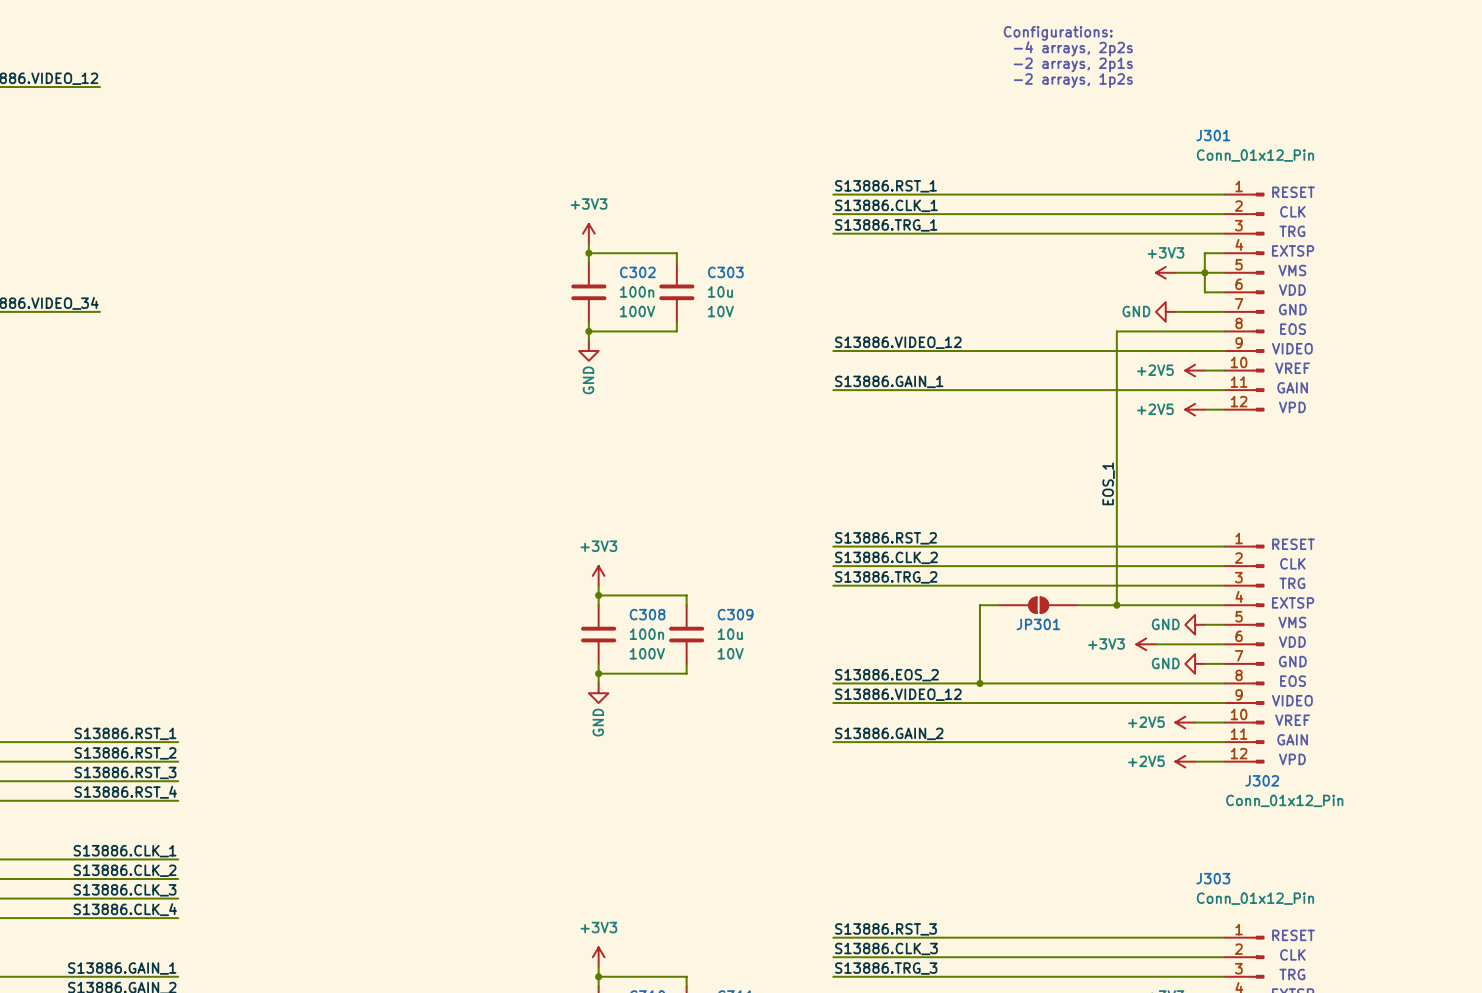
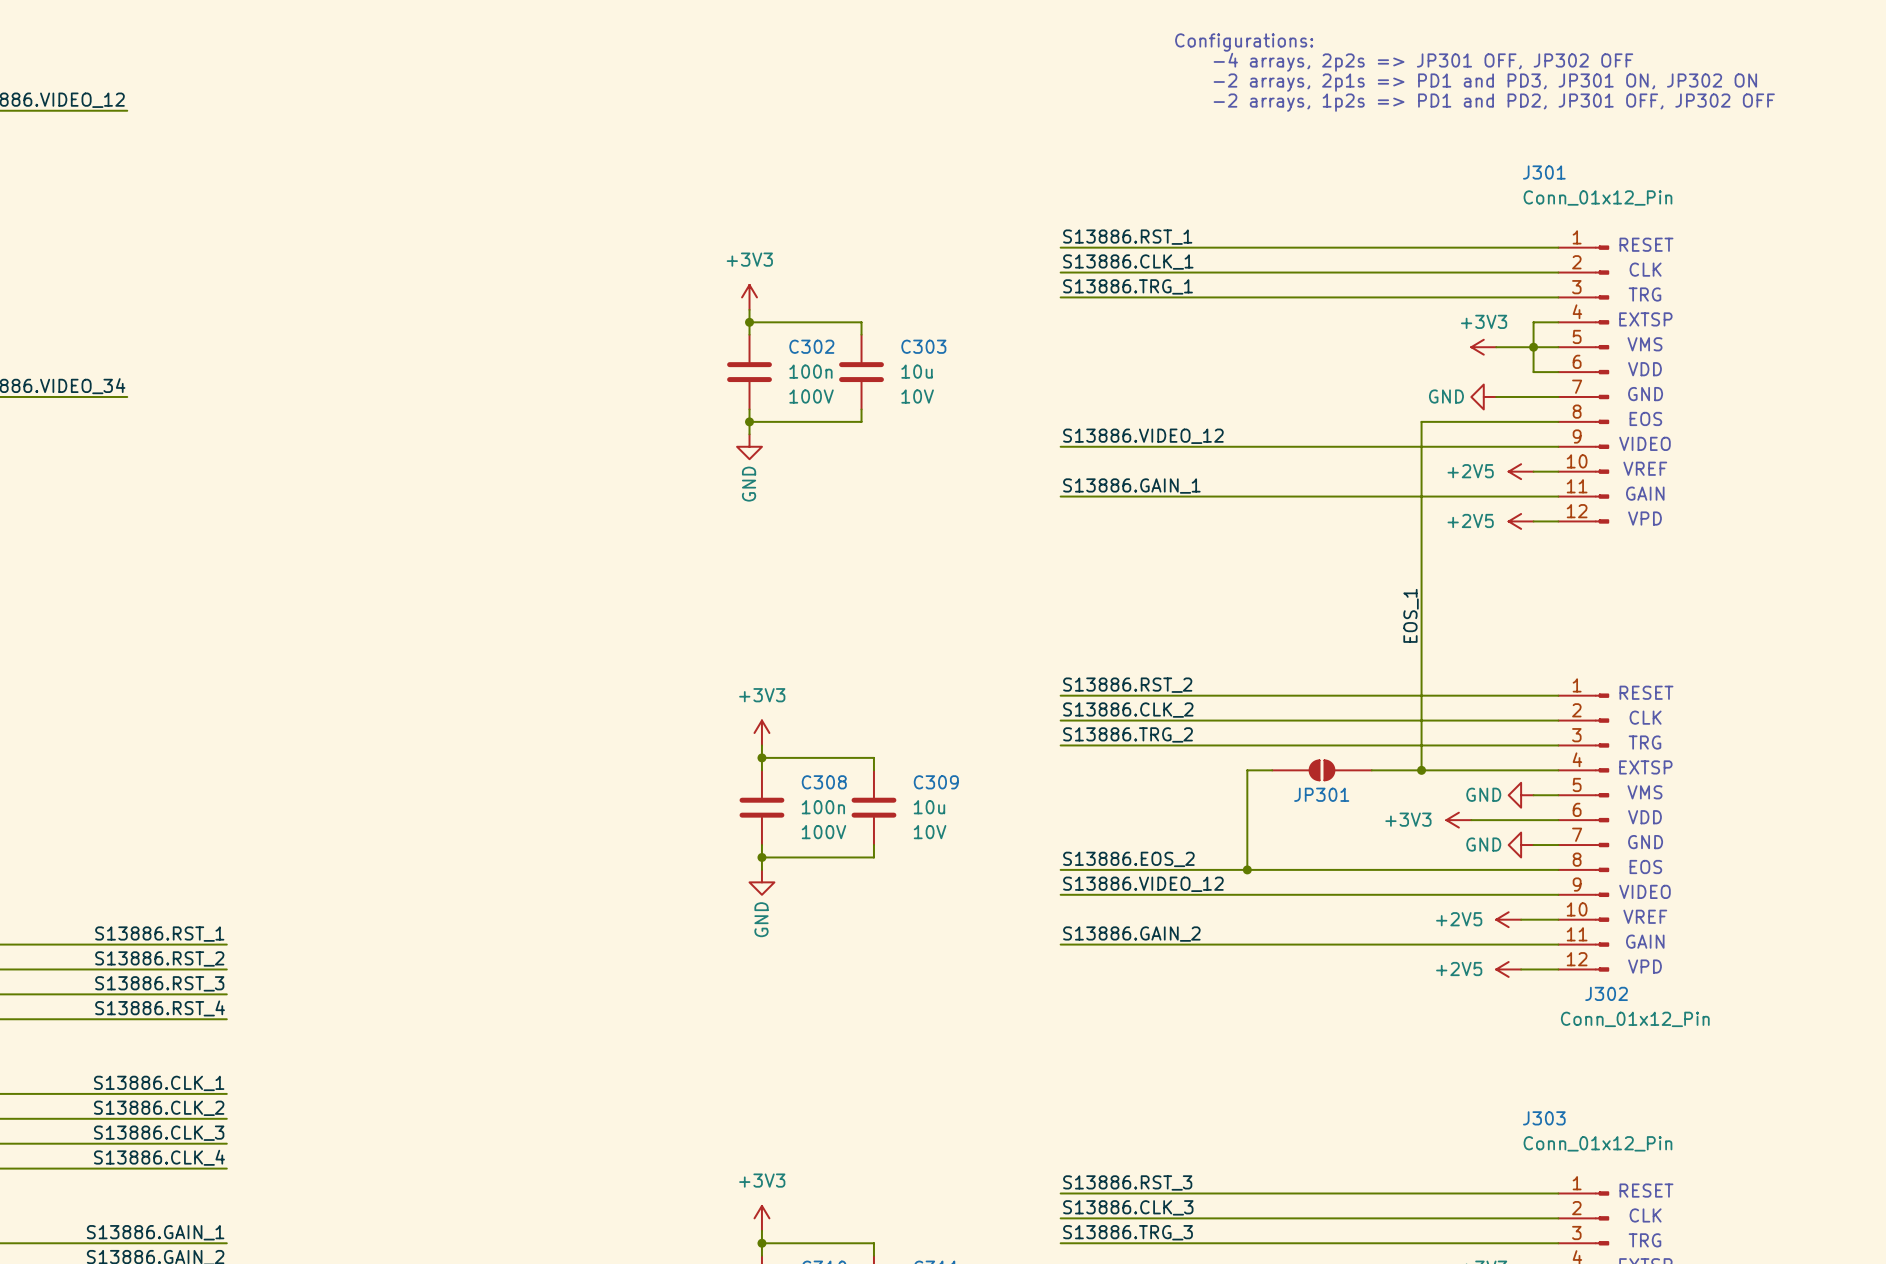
text position: Configurations: (1058, 33) -> Configurations: (1244, 42)
text: -4 arrays, 2p2s (1073, 48) -> -4 arrays, 2p2s => JP301 OFF, JP302 OFF (1423, 62)
text: -2 arrays, 2p1s (1073, 64) -> none
text: none -> -2 arrays, 2p1s => PD1 and PD3, JP301 ON, JP302 ON (1485, 82)
text: -2 arrays, 1p2s (1073, 80) -> none
text: none -> -2 arrays, 1p2s => PD1 and PD2, JP301 OFF, JP302 OFF (1494, 102)

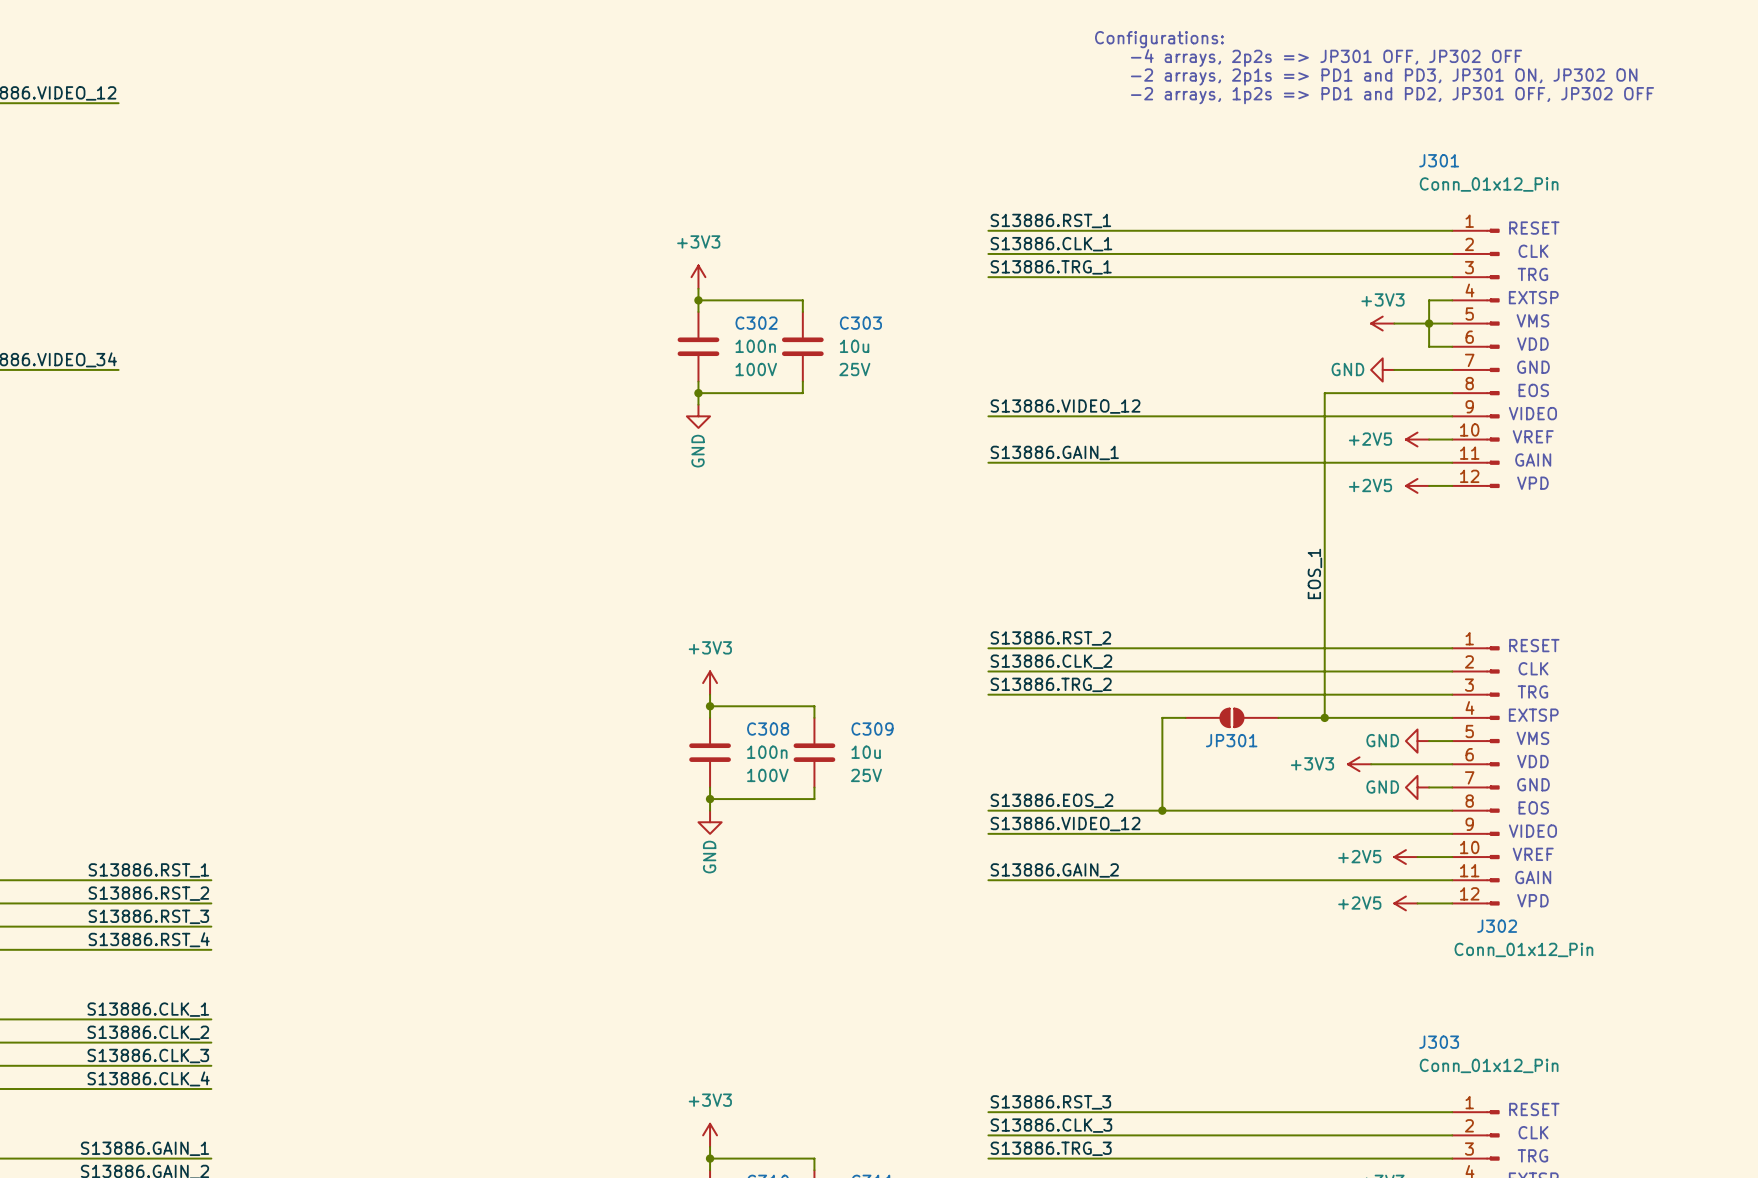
C303 text: 10V (917, 396) -> 25V (854, 369)
C309 text: 10V (930, 832) -> 25V (866, 775)

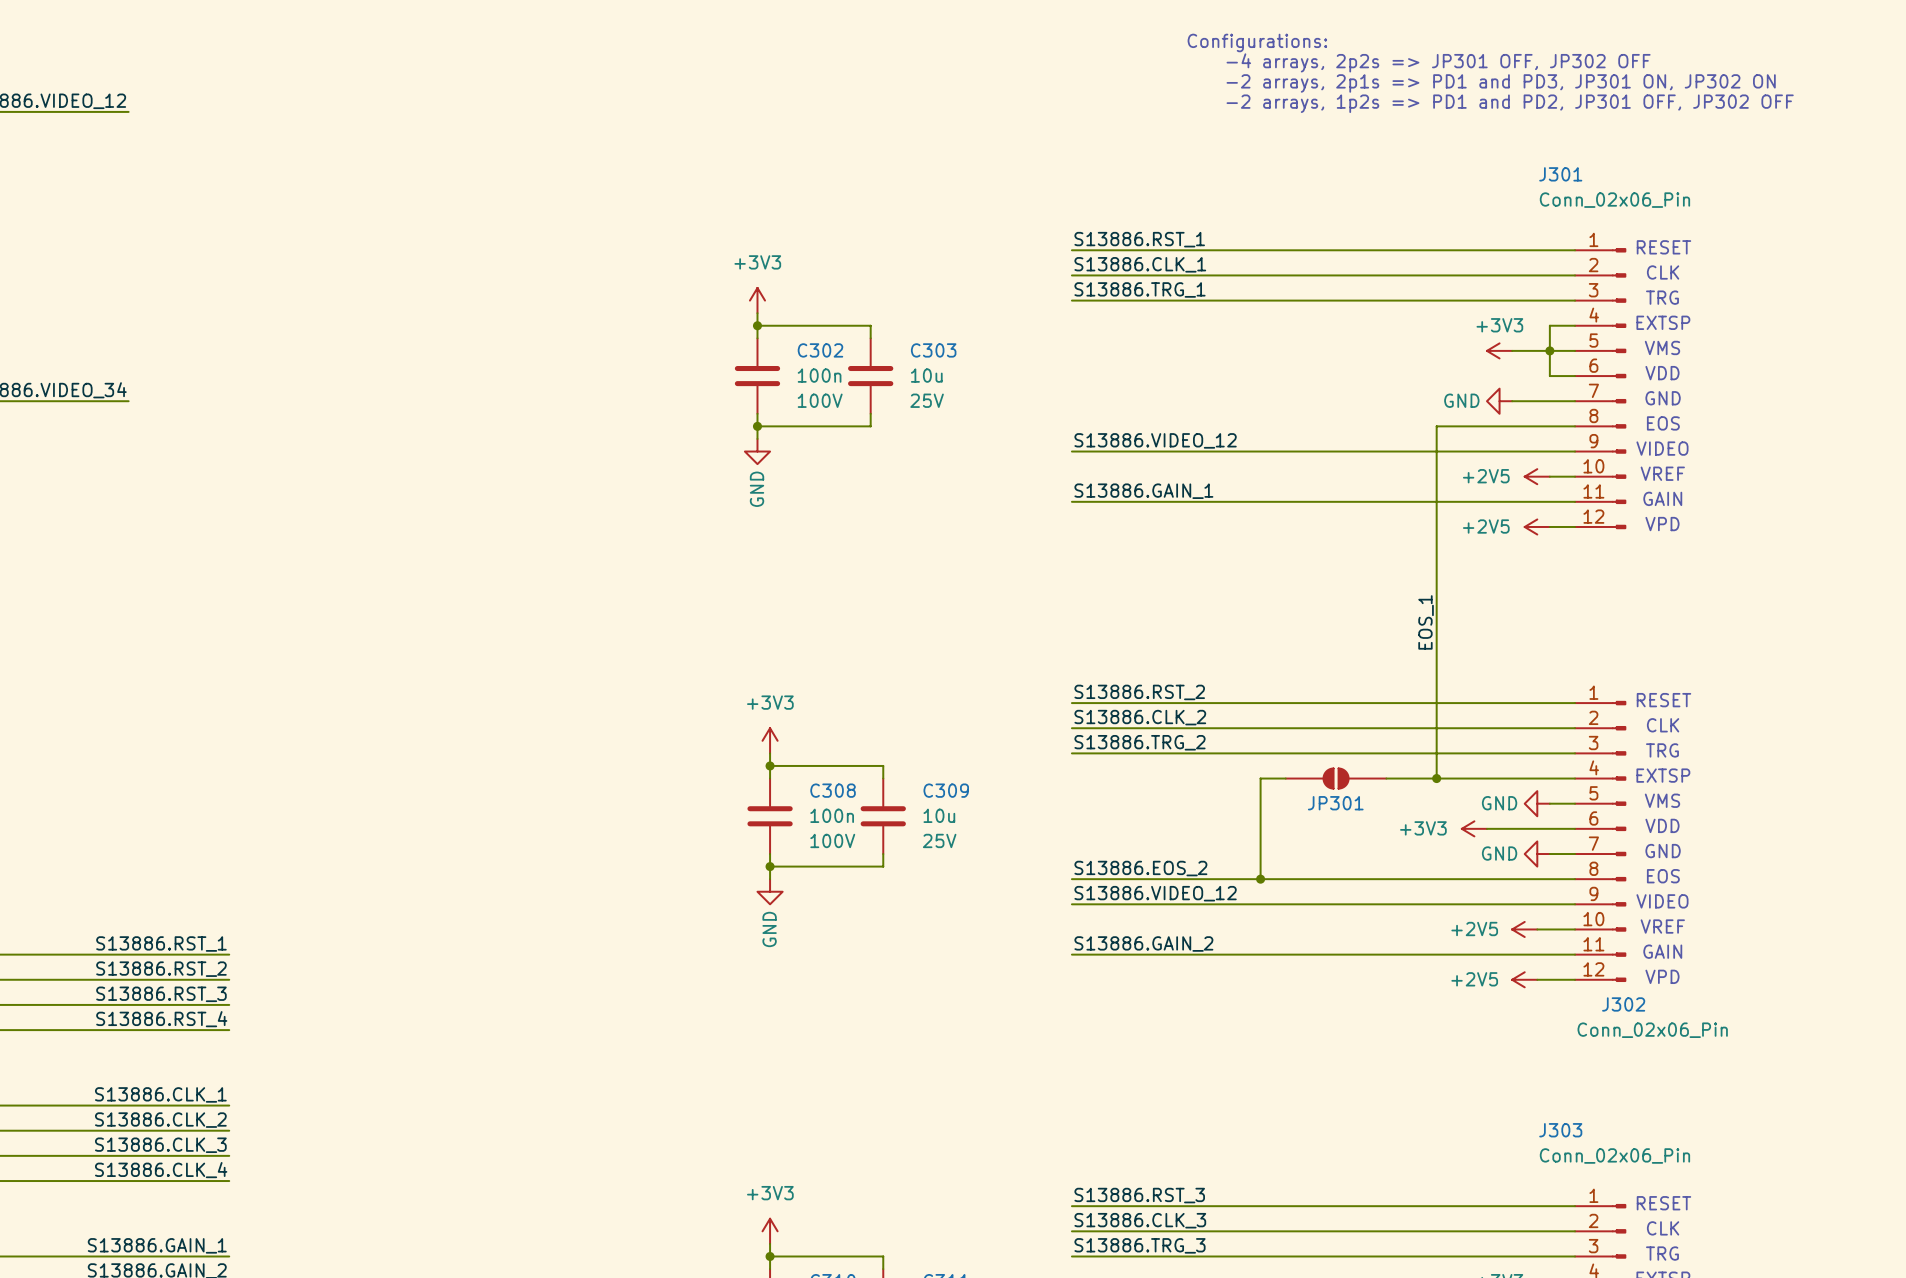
J301 value: Conn_01x12_Pin (1489, 184) -> Conn_02x06_Pin (1614, 200)
J302 value: Conn_01x12_Pin (1523, 949) -> Conn_02x06_Pin (1652, 1030)
J303 value: Conn_01x12_Pin (1489, 1065) -> Conn_02x06_Pin (1614, 1156)

